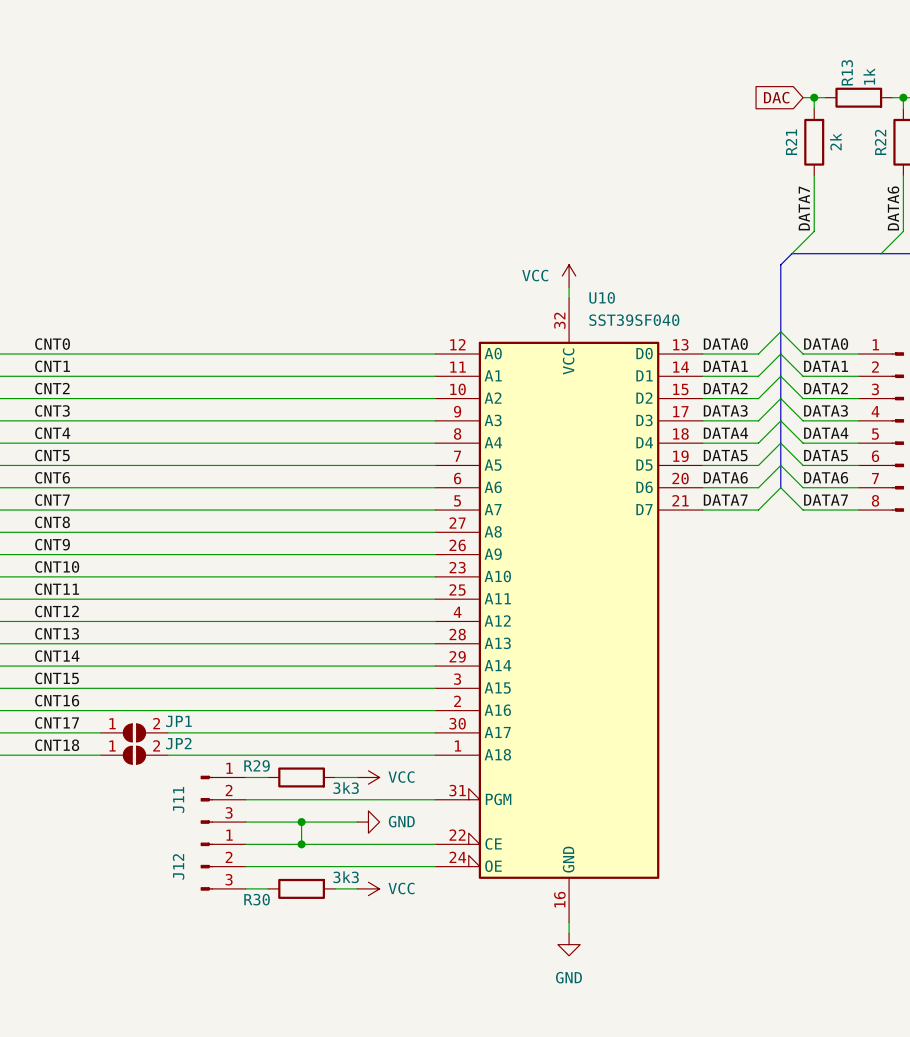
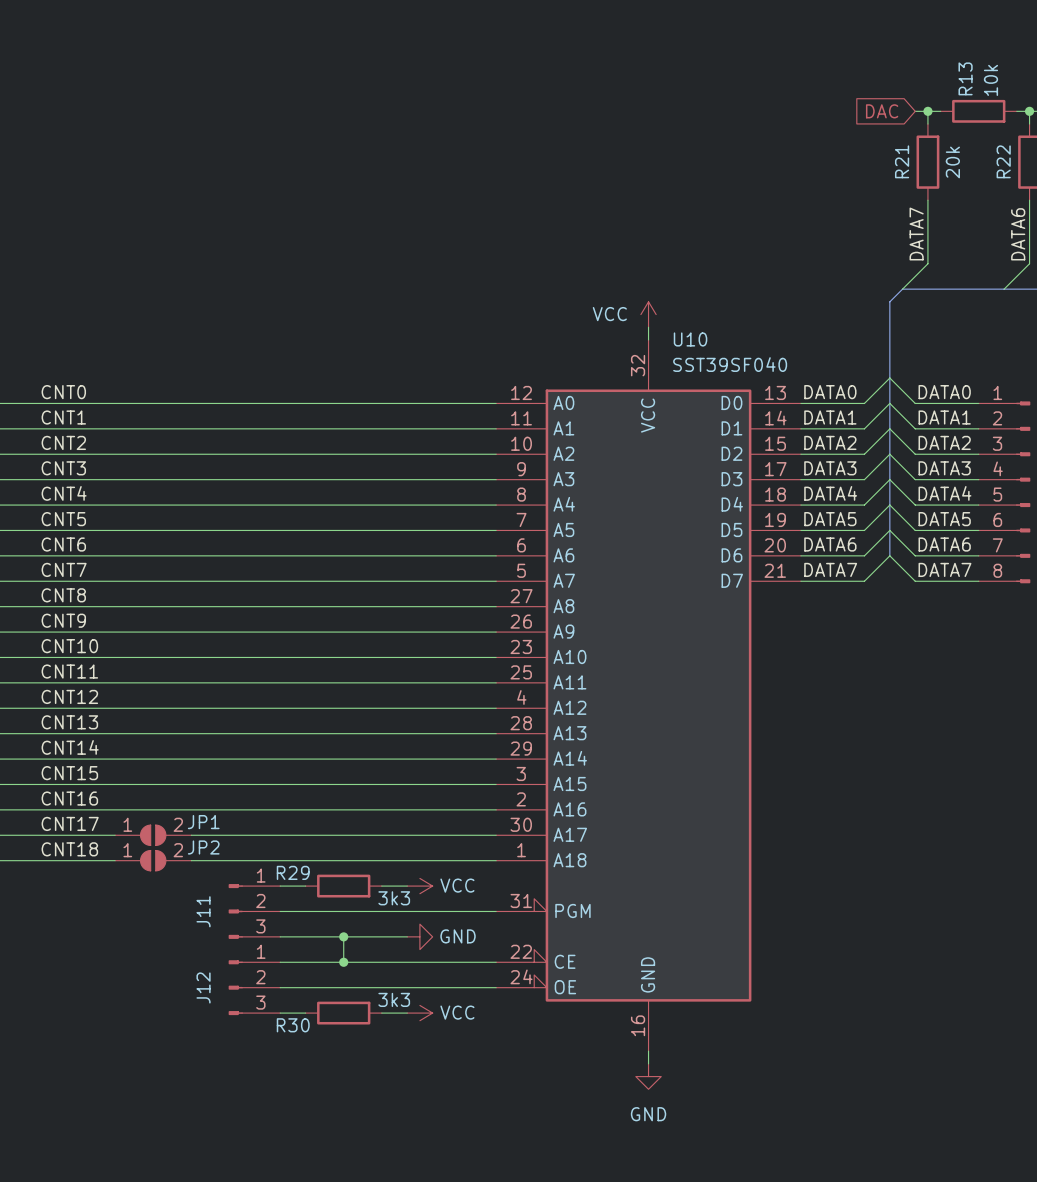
R13 value: 1k (869, 76) -> 10k (990, 80)
R21 value: 2k (835, 141) -> 20k (952, 162)

